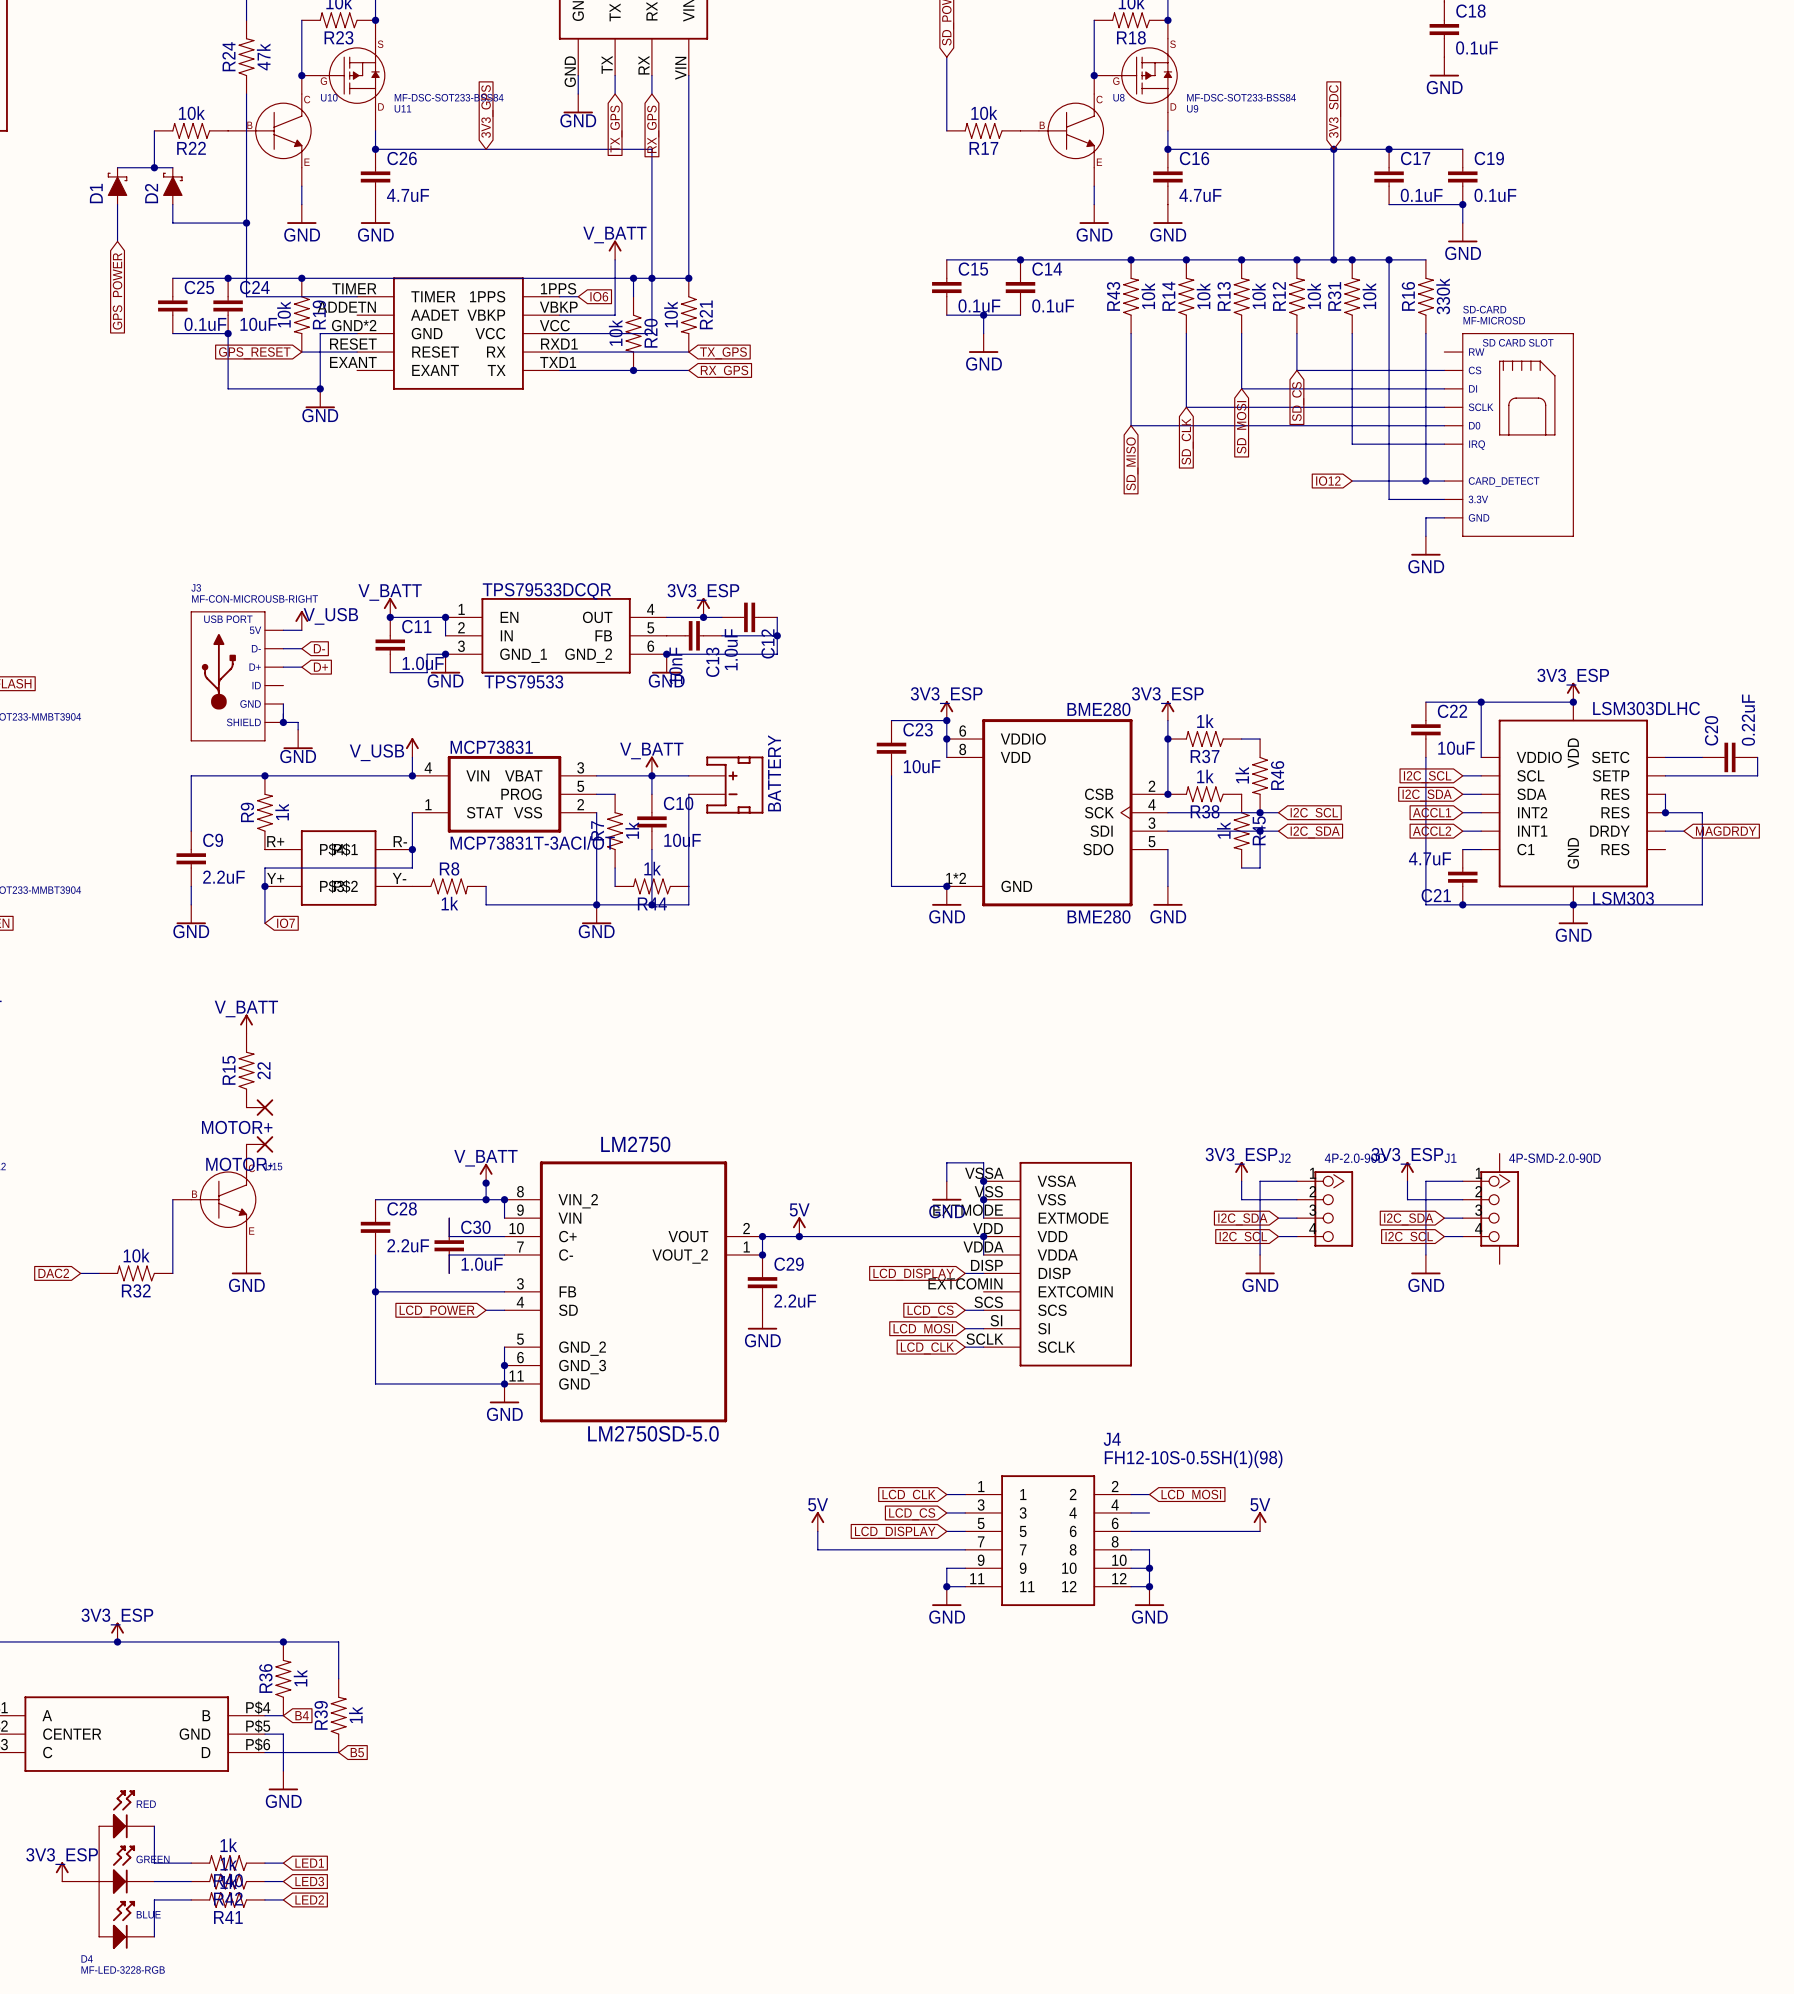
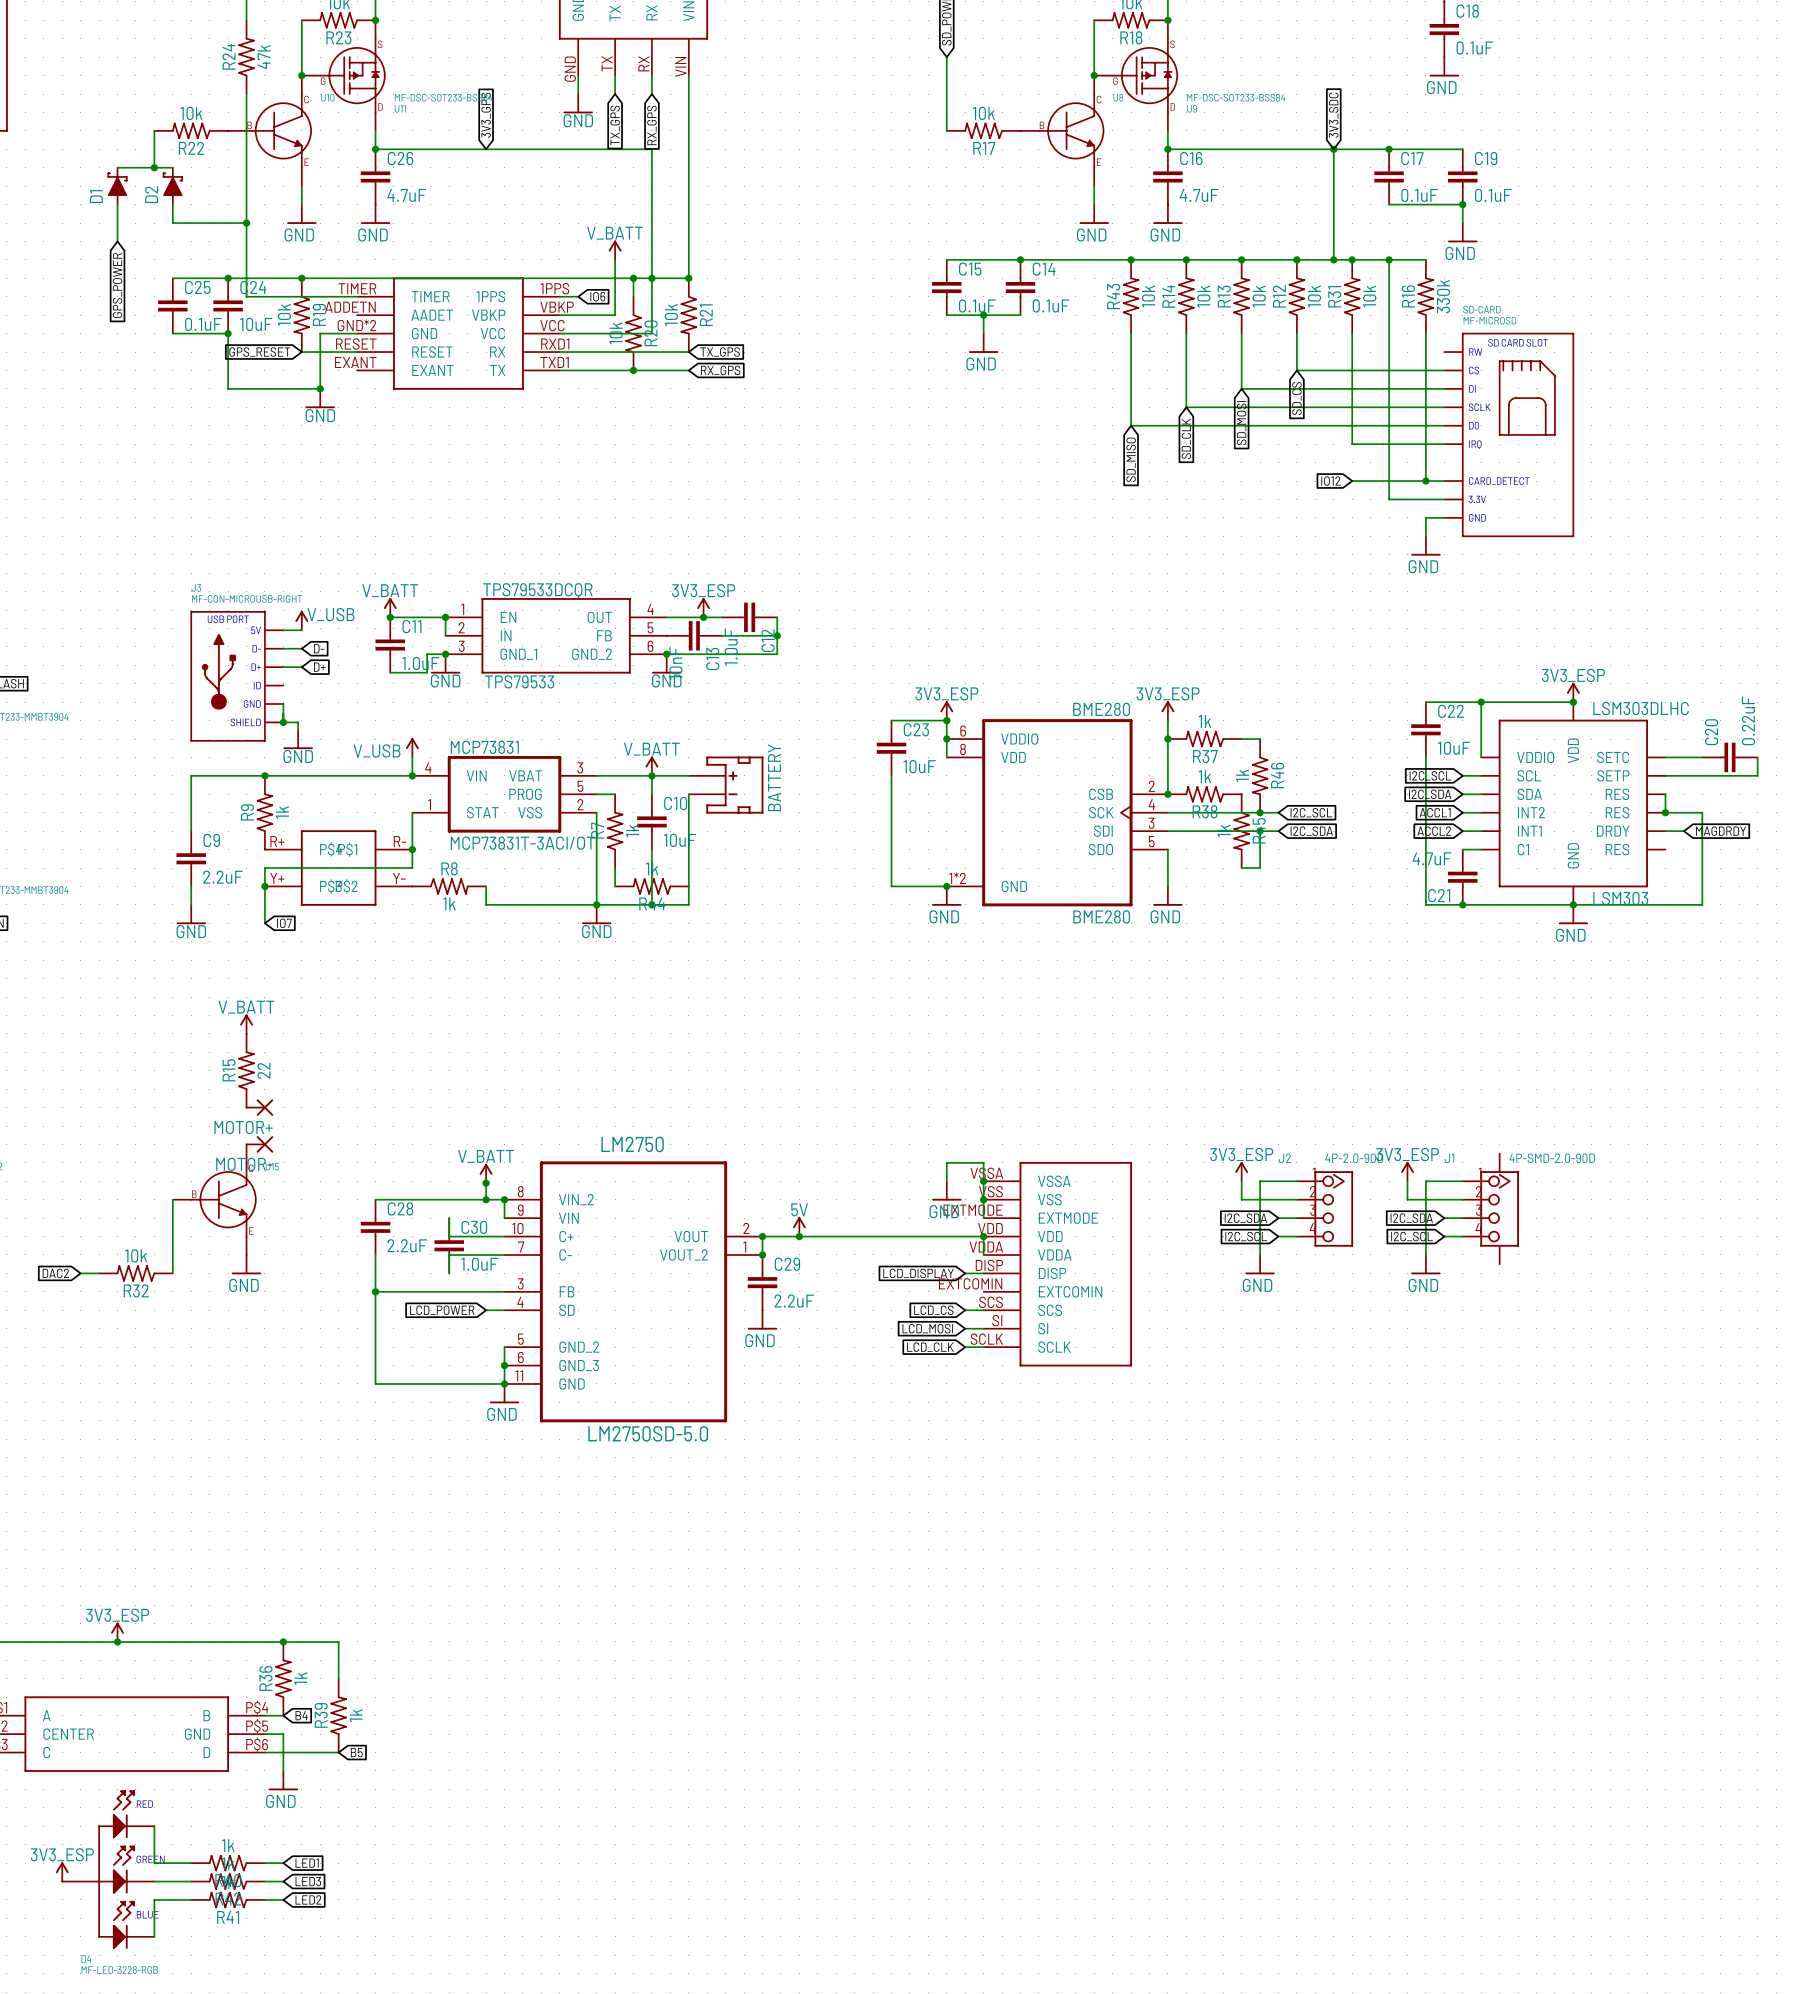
wire: (946, 1494) (965, 1494) -> none
wire: (1131, 1494) (1149, 1494) -> none
global label: LCD_CLK (909, 1495) -> none
global label: LCD_MOSI (1191, 1495) -> none
wire: (946, 1512) (965, 1512) -> none
wire: (1131, 1512) (1149, 1512) -> none
global label: LCD_CS (912, 1514) -> none
power symbol: 5V (817, 1521) -> none
power symbol: 5V (1260, 1521) -> none
wire: (817, 1531) (817, 1549) (965, 1549) -> none
wire: (946, 1531) (965, 1531) -> none
wire: (1131, 1531) (1260, 1531) -> none
global label: LCD_DISPLAY (895, 1532) -> none
J4: FH12-10S-0.5SH(1)(98) (1048, 1540) -> none
wire: (1131, 1549) (1149, 1549) (1149, 1586) (1131, 1586) -> none
wire: (965, 1568) (946, 1568) (946, 1586) (965, 1586) -> none
wire: (1131, 1568) (1149, 1568) -> none
junction: (1149, 1568) -> none
junction: (946, 1586) -> none
junction: (1149, 1586) -> none
power symbol: GND (946, 1596) -> none
power symbol: GND (1149, 1596) -> none

